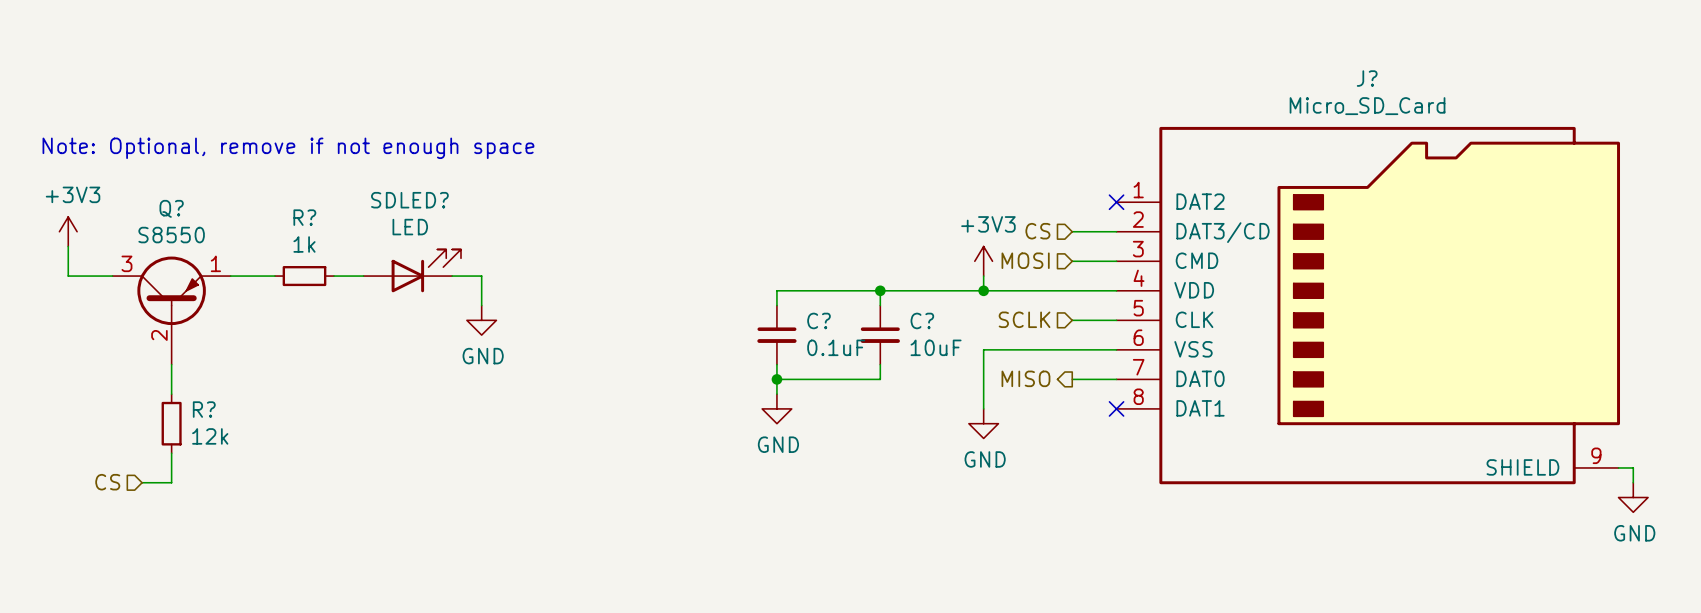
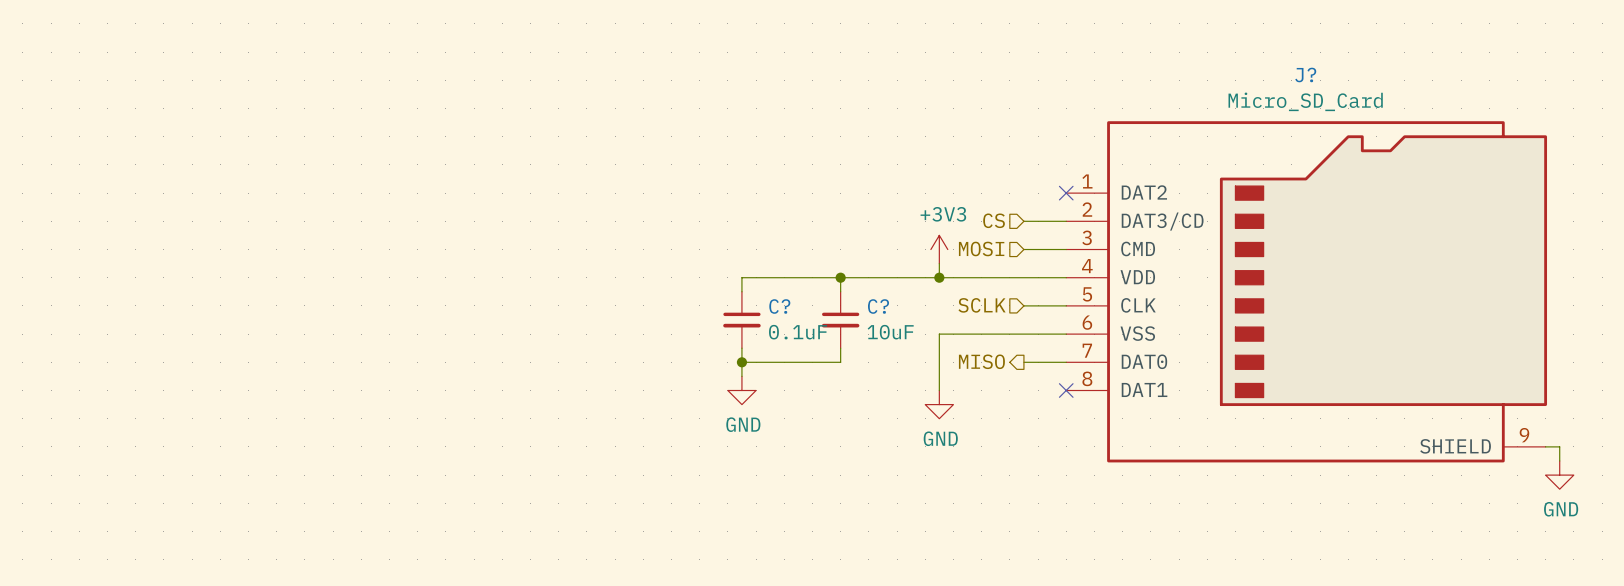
text: Note: Optional, remove if not enough space (288, 148) -> none
power symbol: +3V3 (68, 231) -> none
wire: (68, 246) (68, 276) (112, 276) -> none
SDLED?: LED (412, 270) -> none
wire: (230, 276) (274, 276) -> none
R?: 1k (304, 276) -> none
wire: (334, 276) (363, 276) -> none
wire: (452, 276) (481, 276) (481, 305) -> none
Q?: S8550 (171, 310) -> none
power symbol: GND (481, 320) -> none
wire: (171, 364) (171, 394) -> none
R?: 12k (171, 423) -> none
wire: (171, 453) (171, 482) (142, 482) -> none
hierarchical label: CS (107, 482) -> none

